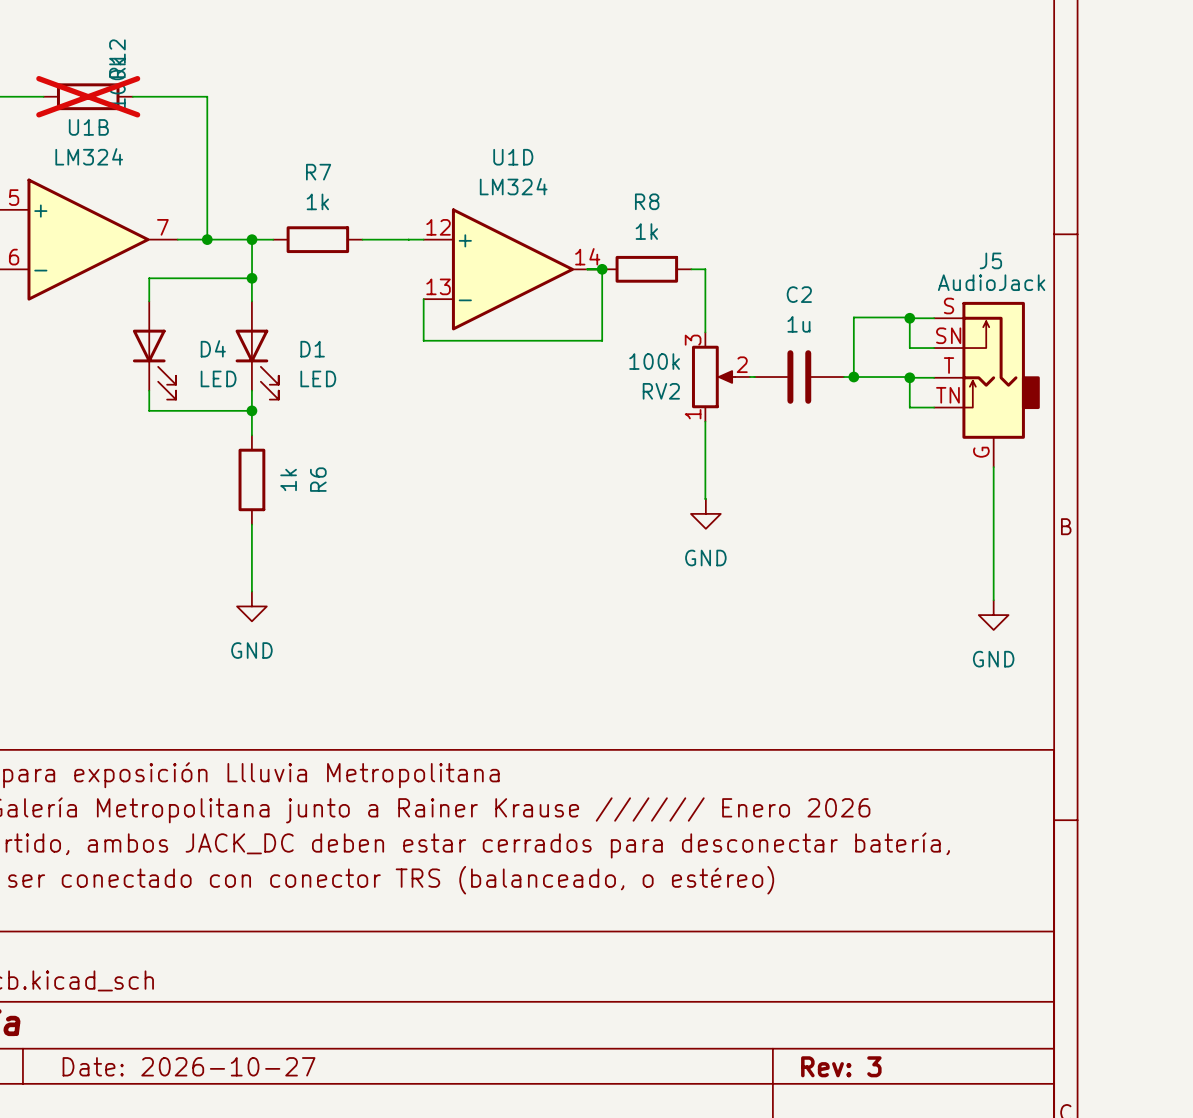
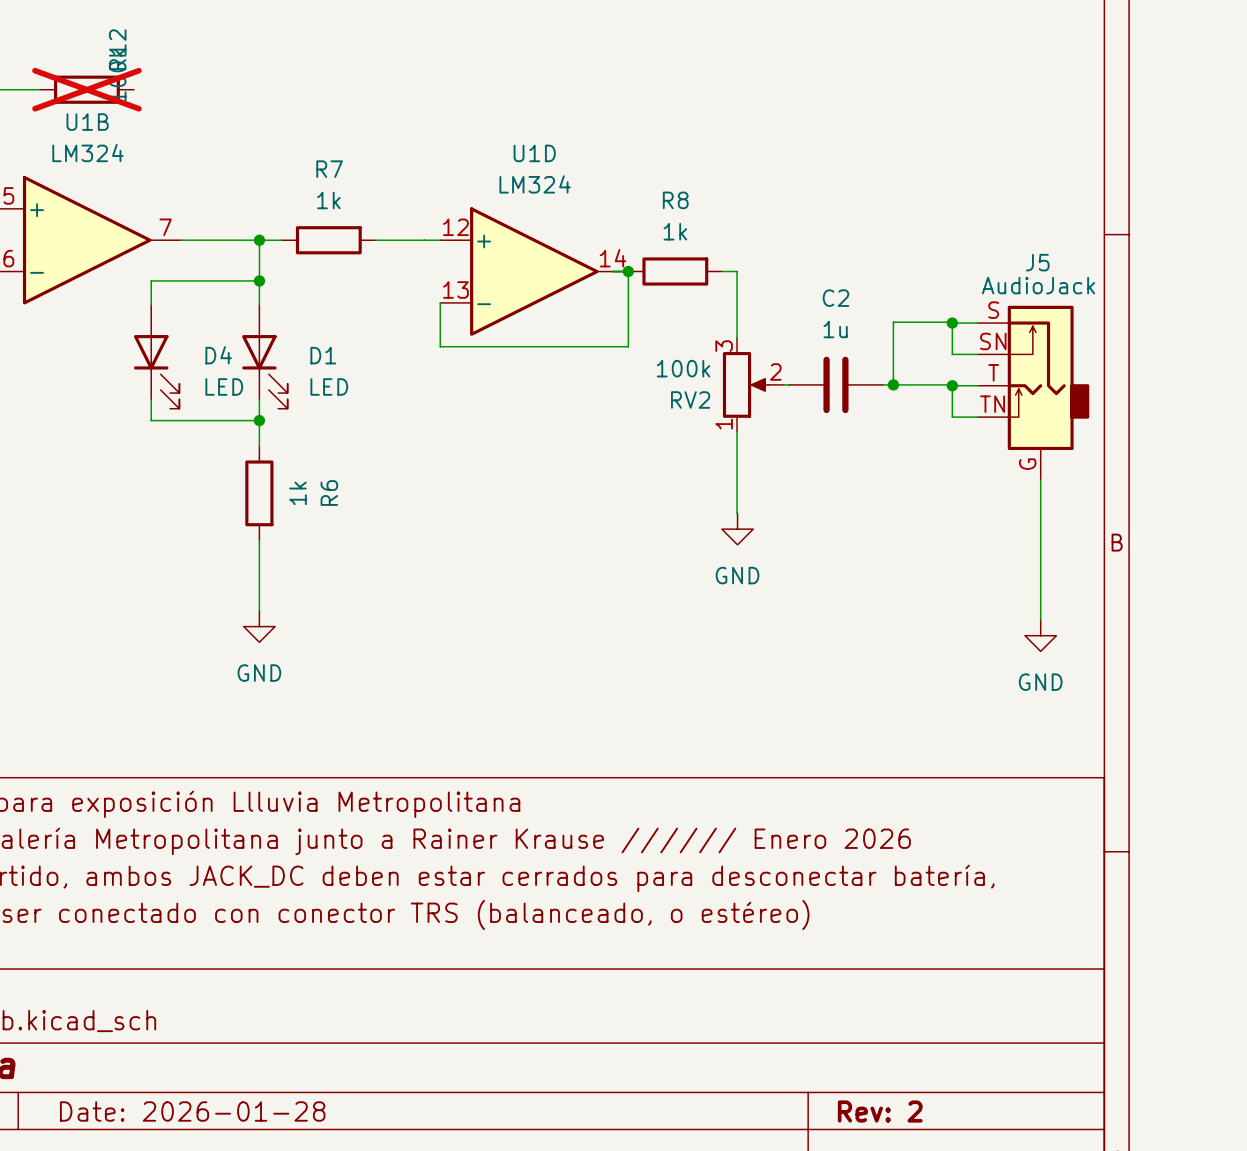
wire: (132, 96) (207, 96) (207, 239) -> none
junction: (207, 239) -> none
title block: Date: 2026-10-27 (189, 1066) -> Date: 2026-01-28 (192, 1111)
title block: Rev: 3 (841, 1066) -> Rev: 2 (880, 1111)

